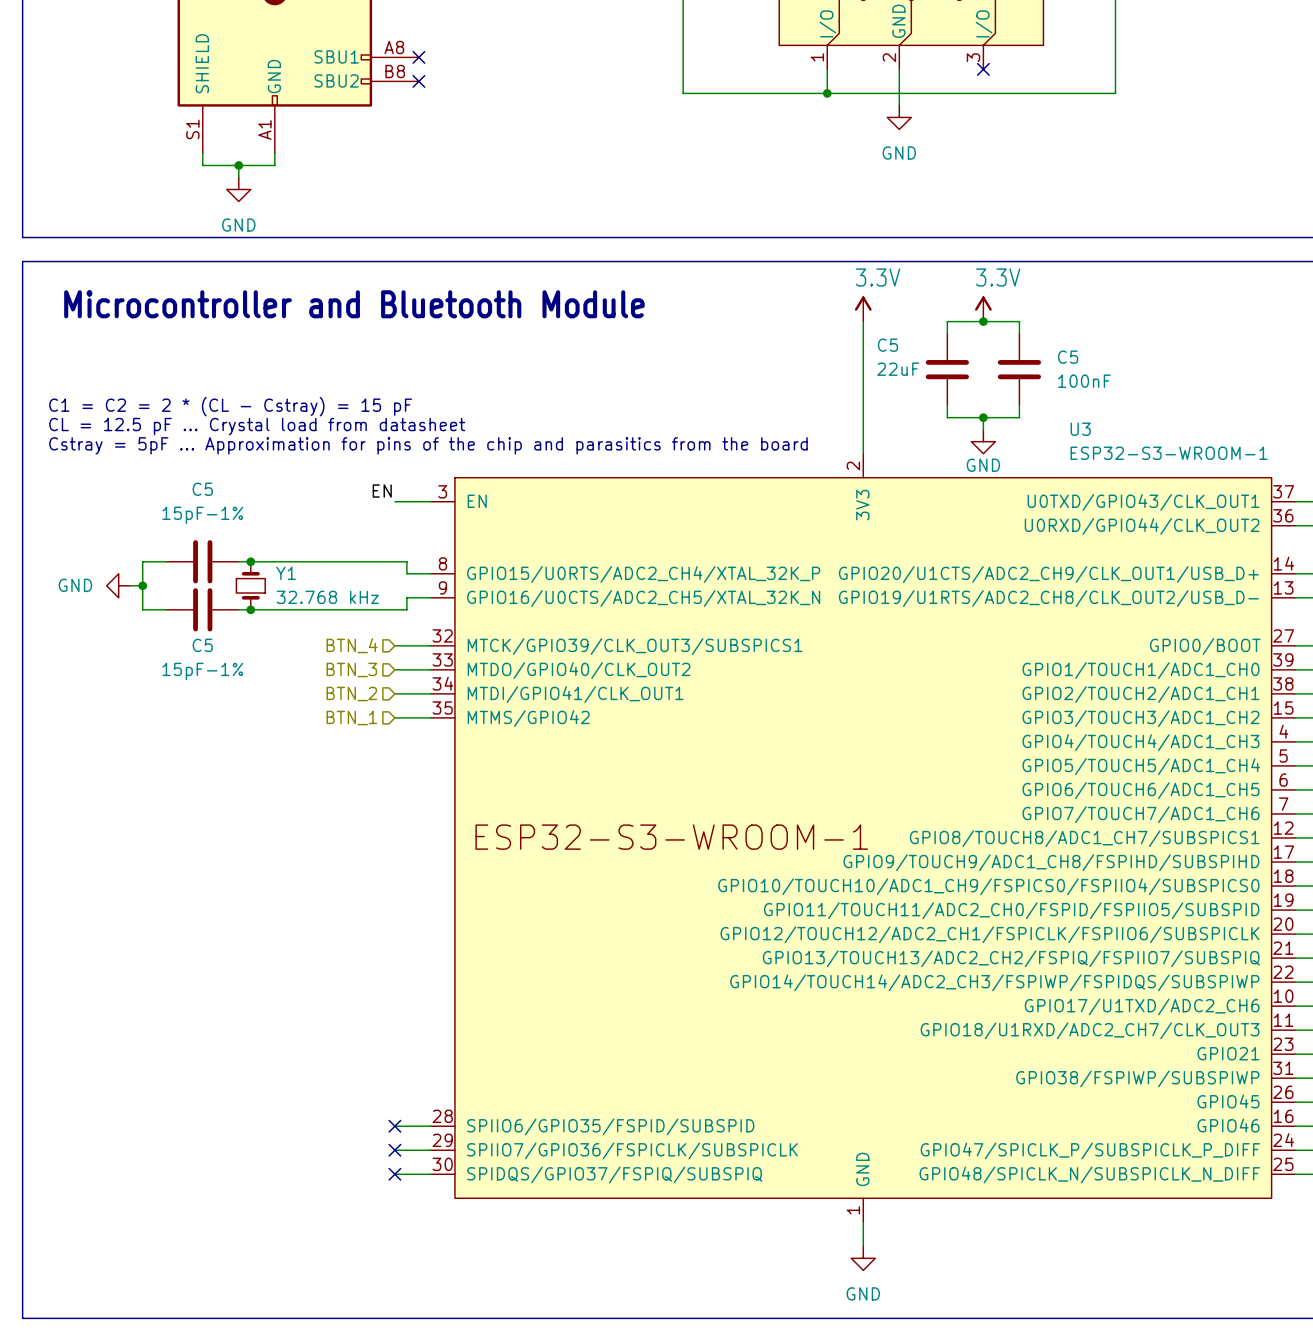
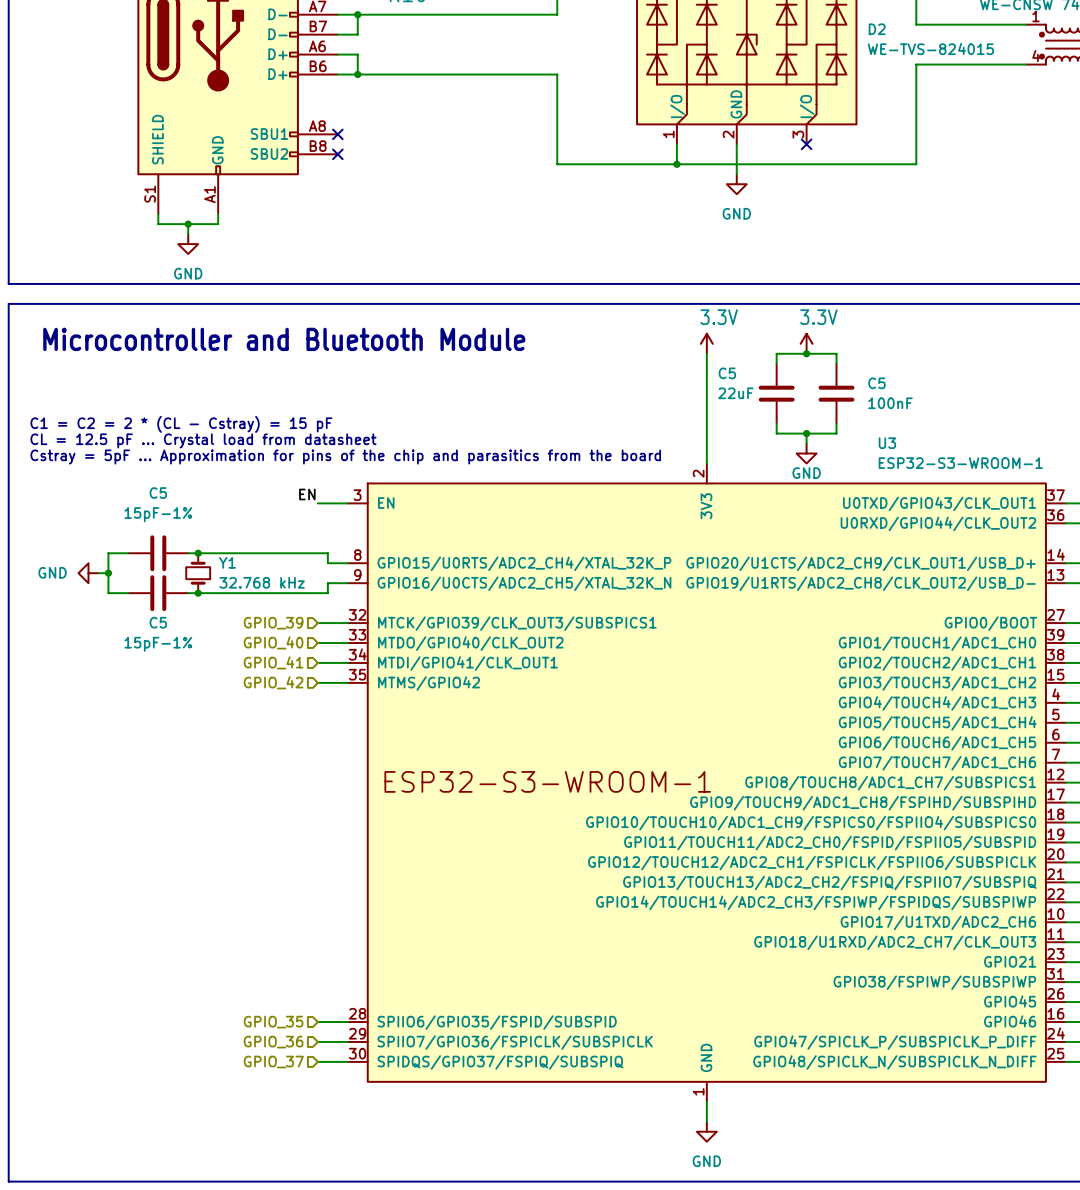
hierarchical label: BTN_4 (352, 645) -> GPIO_39 (273, 623)
hierarchical label: BTN_3 (351, 669) -> GPIO_40 (273, 642)
hierarchical label: BTN_2 (351, 694) -> GPIO_41 (273, 662)
hierarchical label: BTN_1 (351, 718) -> GPIO_42 (273, 682)
hierarchical label: none -> GPIO_35 (273, 1022)
no-connect mark: (394, 1126) -> none
hierarchical label: none -> GPIO_36 (273, 1042)
no-connect mark: (394, 1150) -> none
hierarchical label: none -> GPIO_37 (273, 1062)
no-connect mark: (394, 1174) -> none

